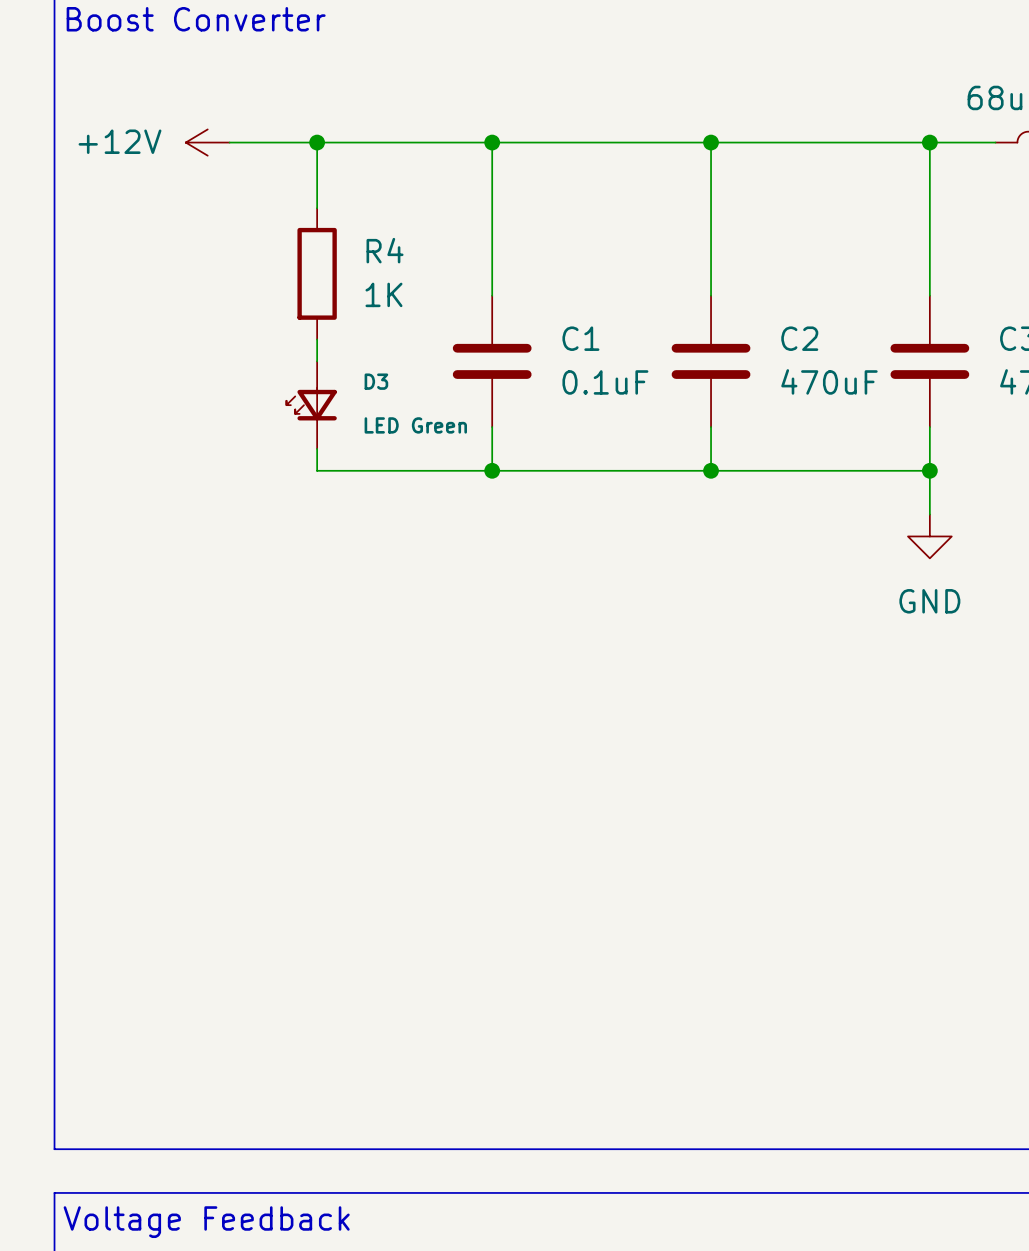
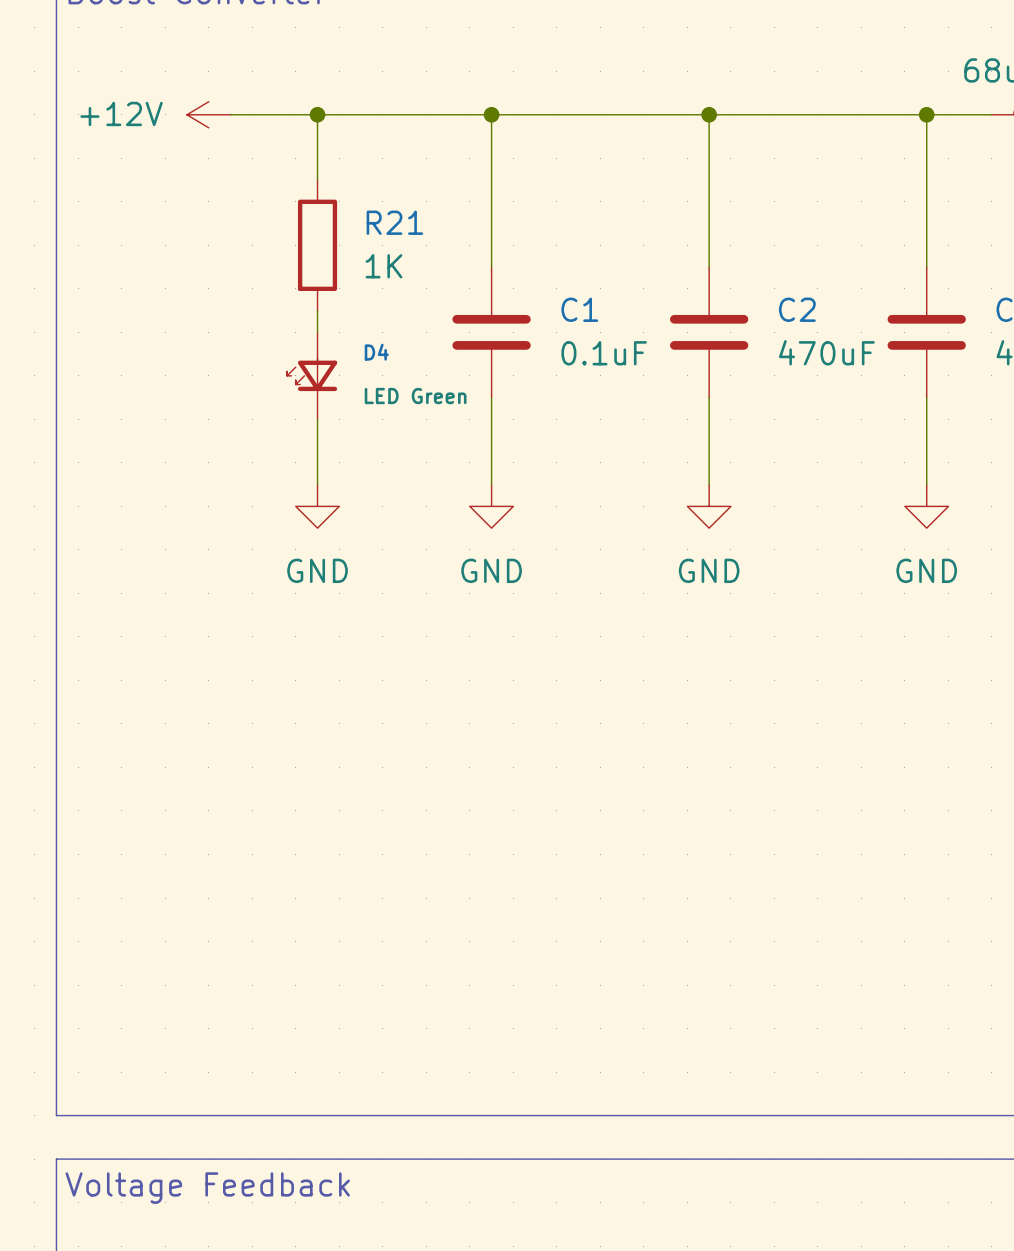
R4 name: R4 (385, 250) -> R21 (394, 222)
D3 name: D3 (376, 381) -> D4 (376, 352)
wire: (317, 470) (929, 470) -> (317, 441) (317, 484)
wire: none -> (491, 441) (491, 484)
junction: (492, 470) -> none
wire: none -> (709, 441) (709, 484)
junction: (711, 470) -> none
junction: (929, 470) -> none
power symbol: none -> GND (317, 506)
power symbol: none -> GND (491, 506)
power symbol: none -> GND (709, 506)

